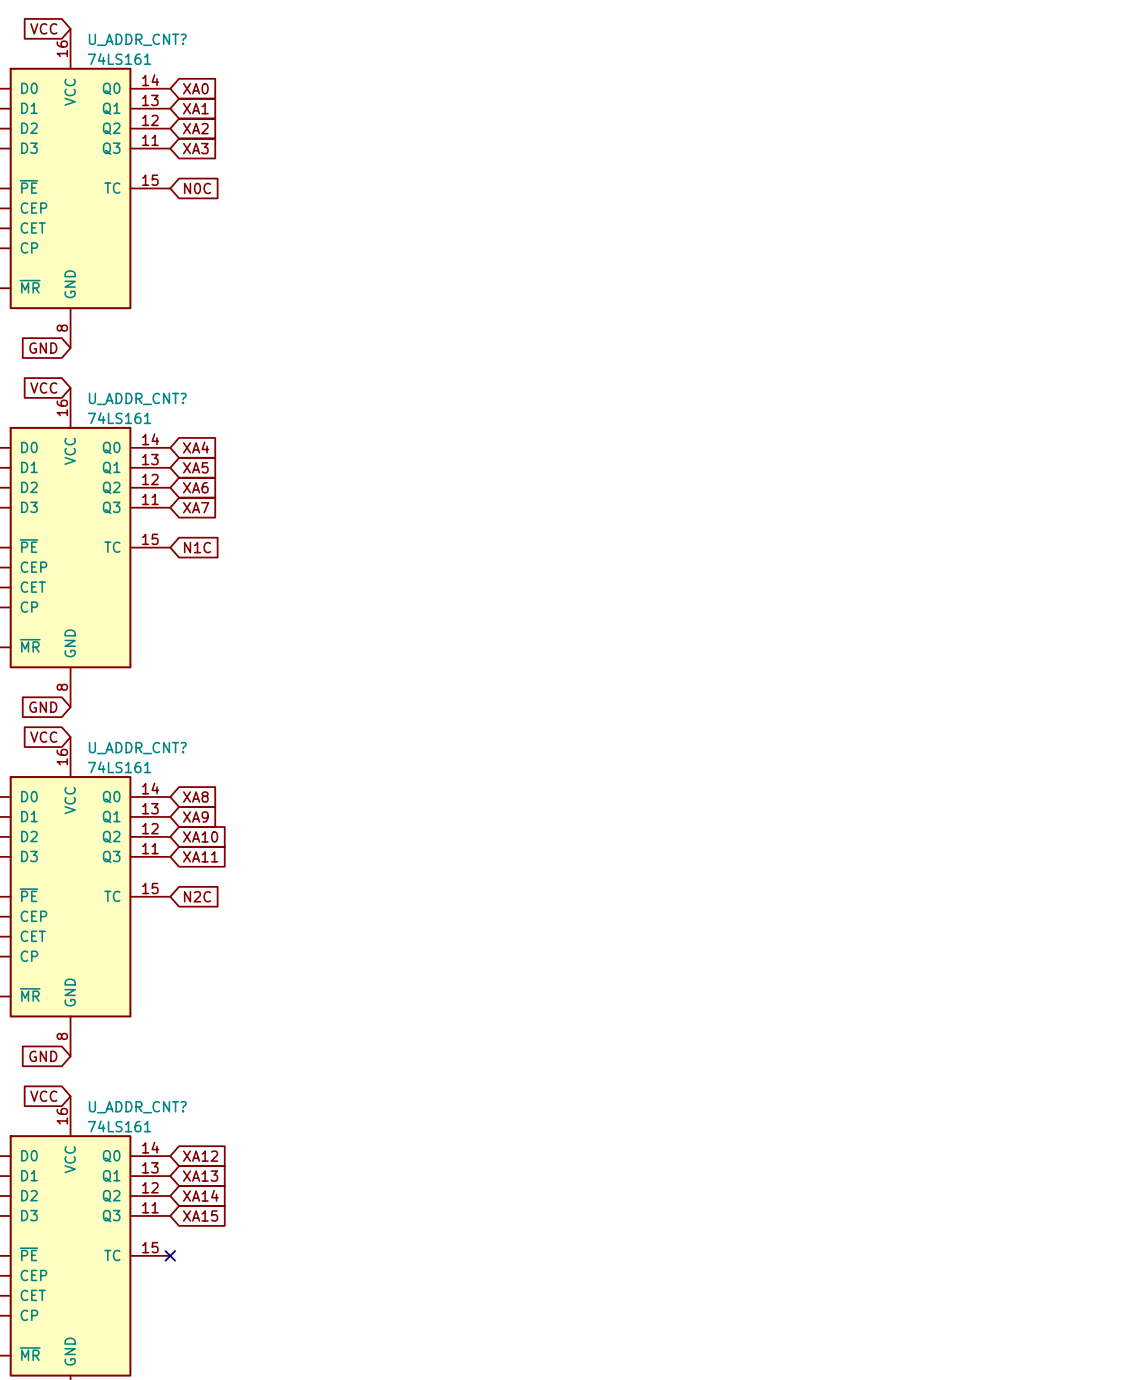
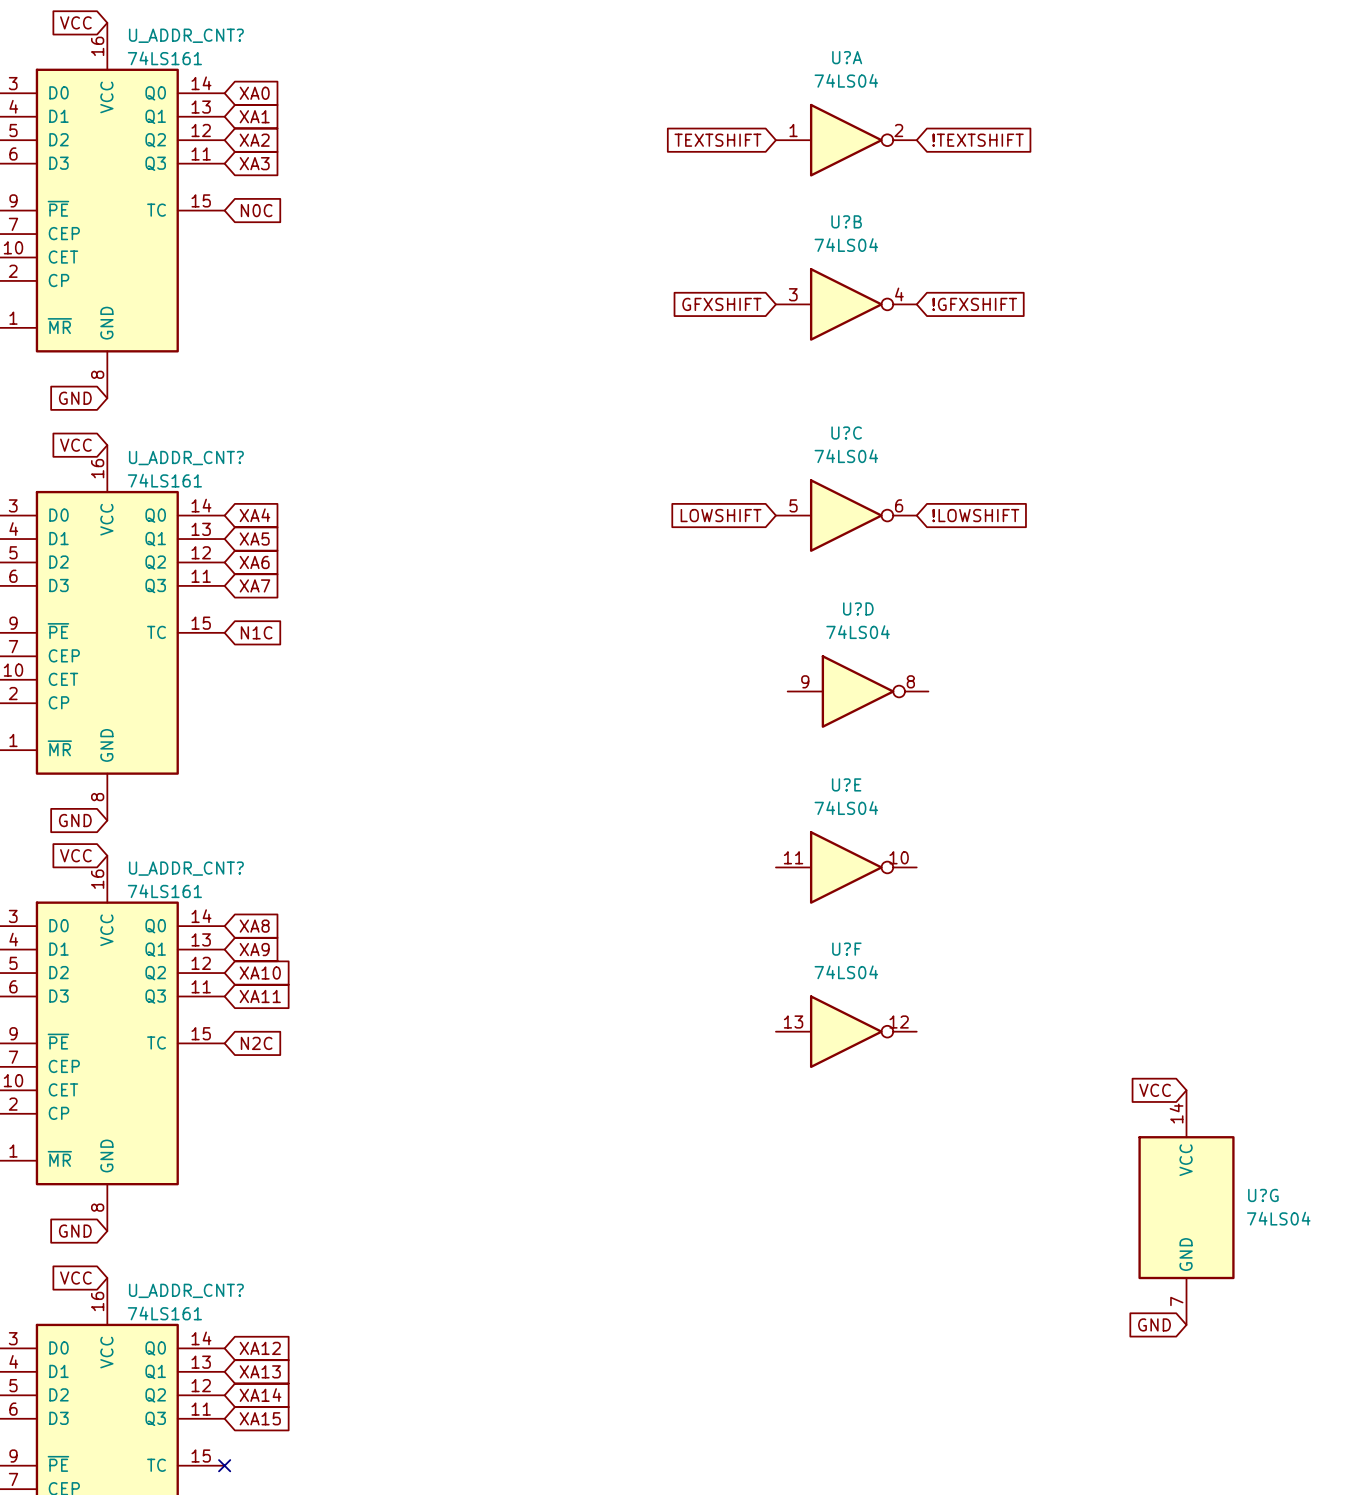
global label: none -> TEXTSHIFT (717, 140)
U?A: none -> 74LS04 (846, 140)
global label: none -> !TEXTSHIFT (978, 140)
global label: none -> GFXSHIFT (721, 304)
U?B: none -> 74LS04 (846, 304)
global label: none -> !GFXSHIFT (974, 304)
global label: none -> LOWSHIFT (721, 515)
U?C: none -> 74LS04 (846, 515)
global label: none -> !LOWSHIFT (975, 515)
U?D: none -> 74LS04 (858, 691)
U?E: none -> 74LS04 (846, 867)
U?F: none -> 74LS04 (846, 1031)
global label: none -> VCC (1155, 1090)
U?G: none -> 74LS04 (1186, 1207)
global label: none -> GND (1154, 1324)

